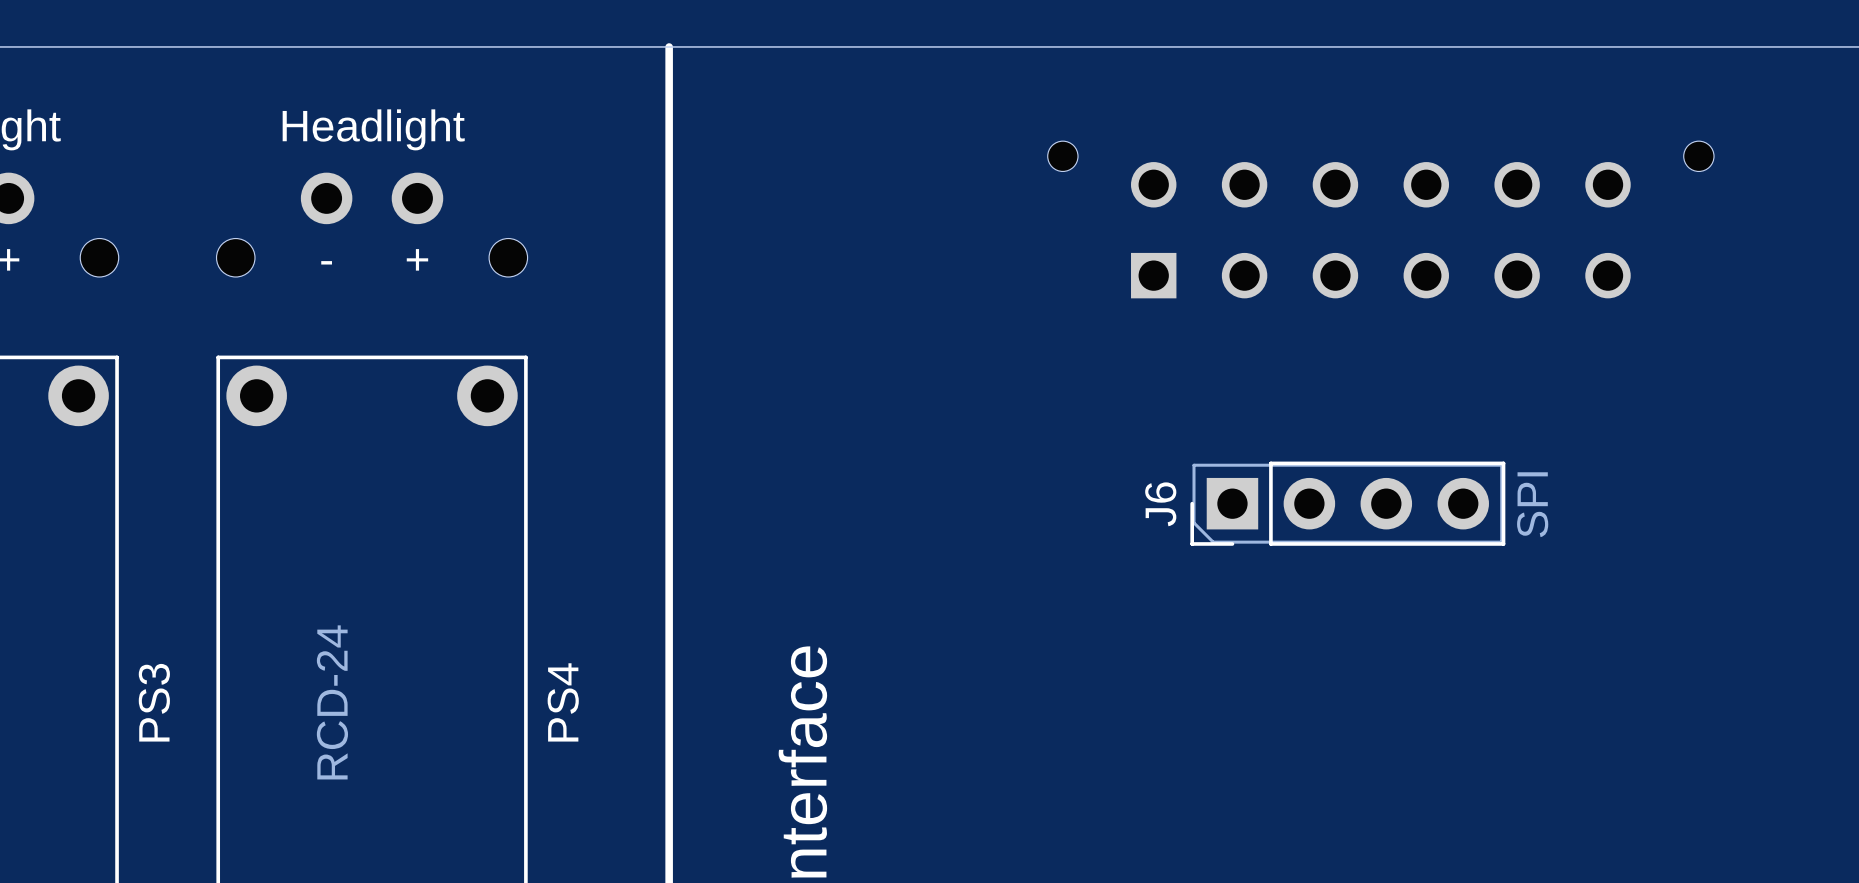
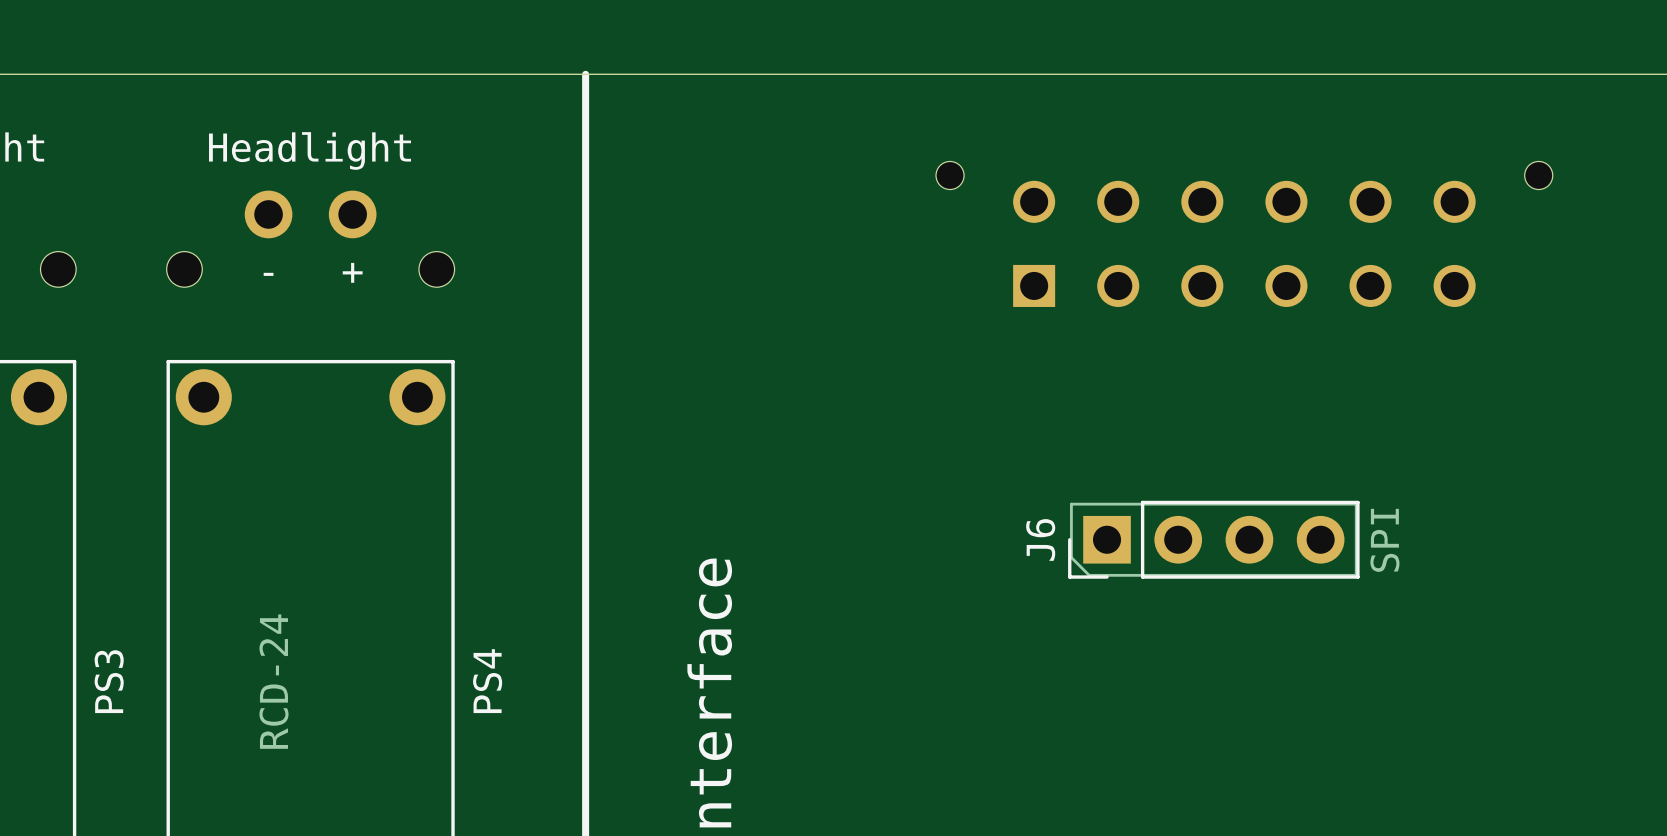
J6 position: (1347, 503) -> (1213, 539)

